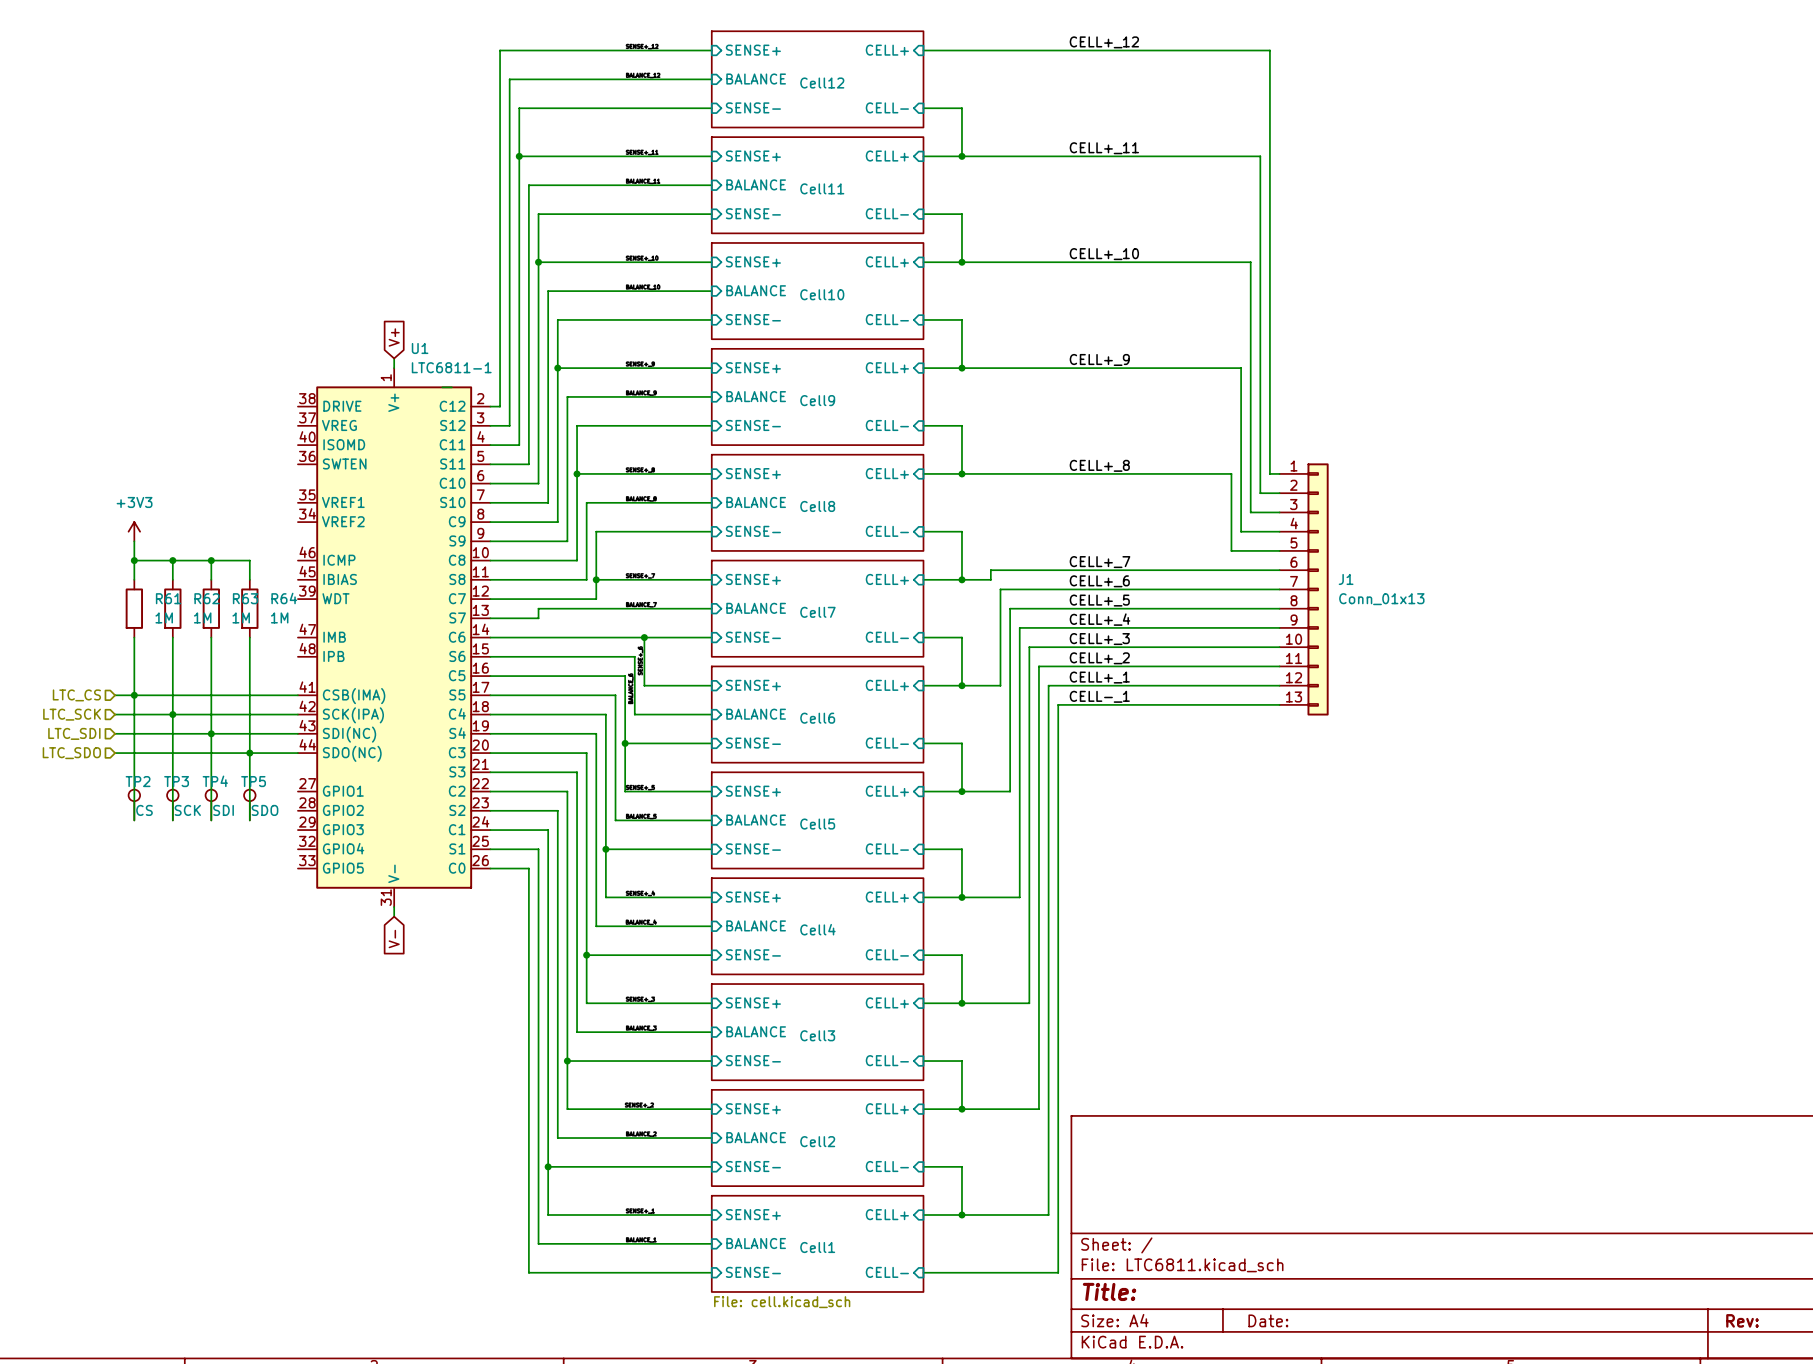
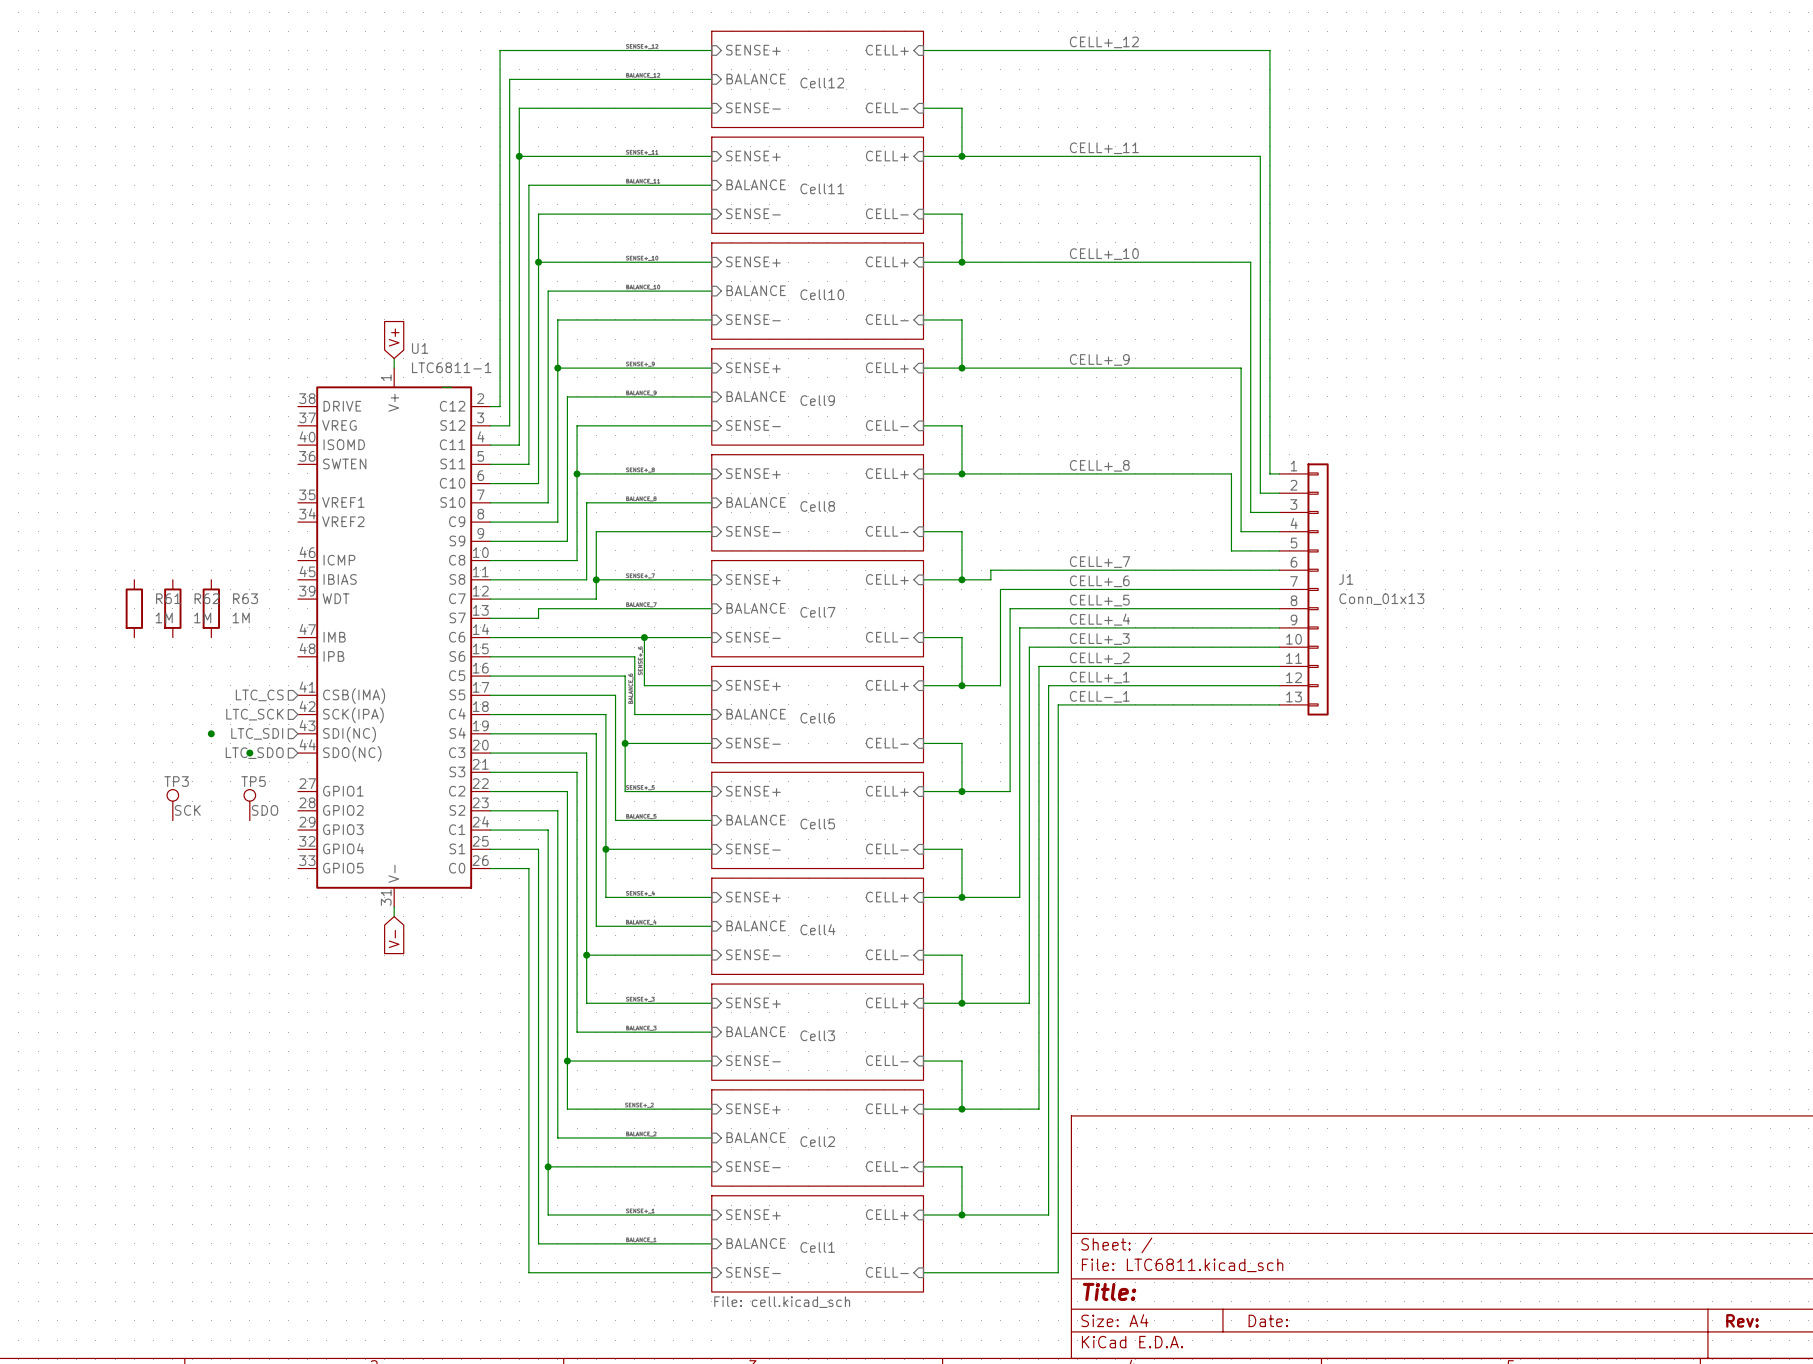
power symbol: +3V3 (134, 531) -> none
wire: (134, 541) (134, 579) -> none
wire: (134, 560) (249, 560) (249, 579) -> none
junction: (134, 560) -> none
wire: (172, 560) (172, 579) -> none
junction: (172, 560) -> none
wire: (211, 560) (211, 579) -> none
junction: (211, 560) -> none
R64: 1M (249, 608) -> none
wire: (134, 637) (134, 820) -> none
wire: (172, 637) (172, 820) -> none
wire: (211, 637) (211, 820) -> none
wire: (249, 637) (249, 820) -> none
hierarchical label position: LTC_CS (76, 695) -> LTC_CS (259, 695)
wire: (115, 695) (297, 695) -> none
junction: (134, 695) -> none
hierarchical label position: LTC_SCK (72, 714) -> LTC_SCK (254, 714)
wire: (115, 714) (297, 714) -> none
junction: (172, 714) -> none
hierarchical label position: LTC_SDI (74, 733) -> LTC_SDI (257, 733)
wire: (115, 733) (297, 733) -> none
hierarchical label position: LTC_SDO (71, 753) -> LTC_SDO (254, 753)
wire: (115, 753) (297, 753) -> none
TP2: CS (134, 805) -> none
TP4: SDI (211, 805) -> none

